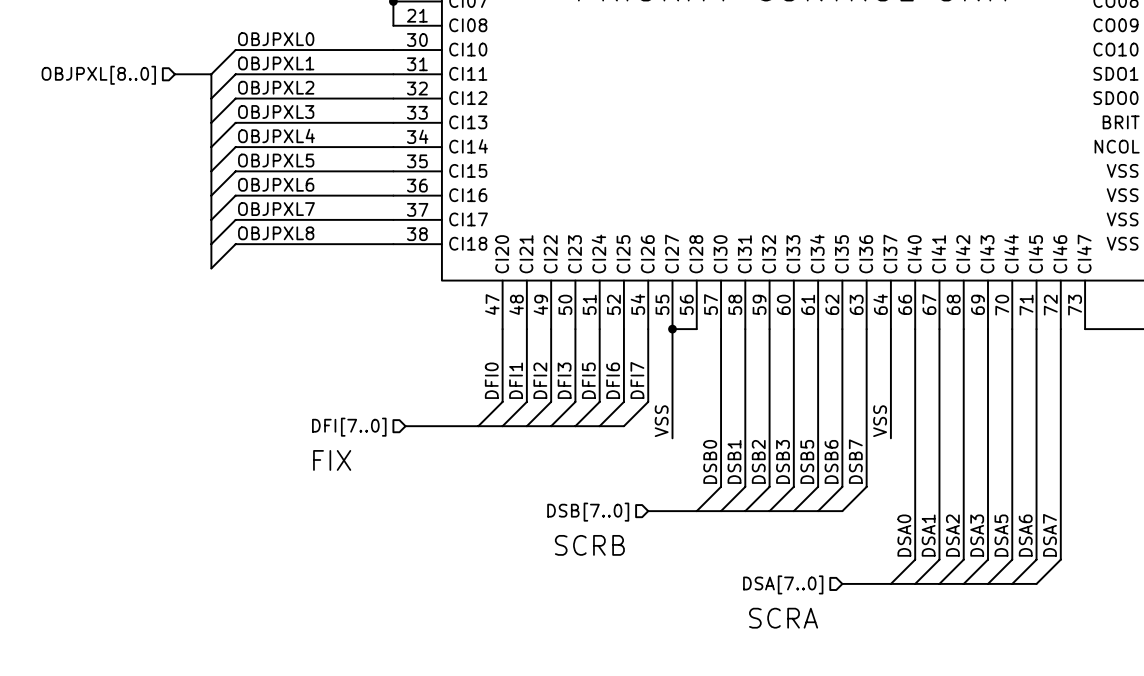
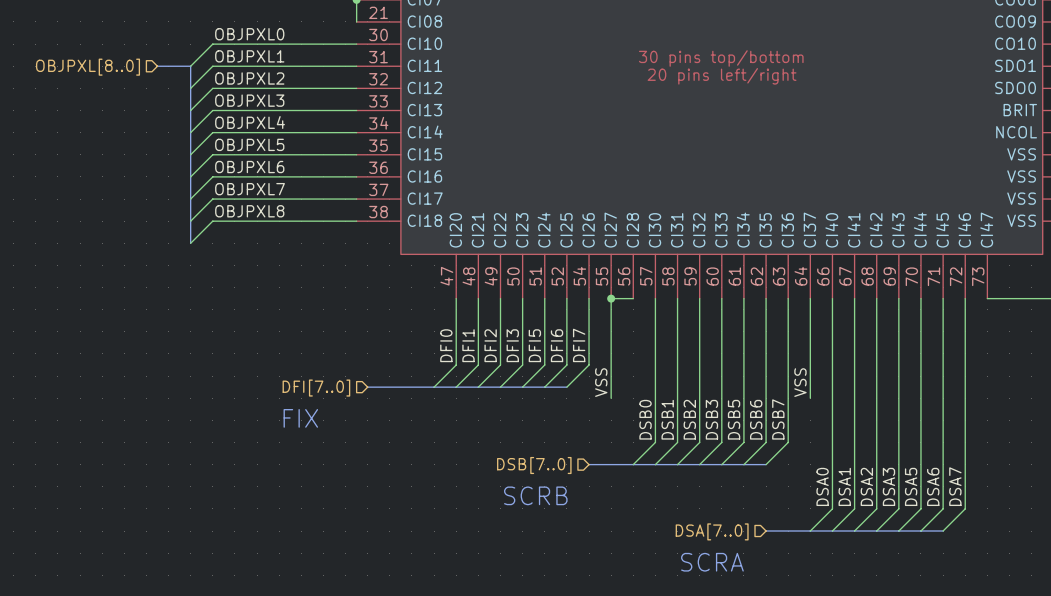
part text: none -> 30 pins top/bottom (721, 58)
part text: none -> 20 pins left/right (722, 76)

